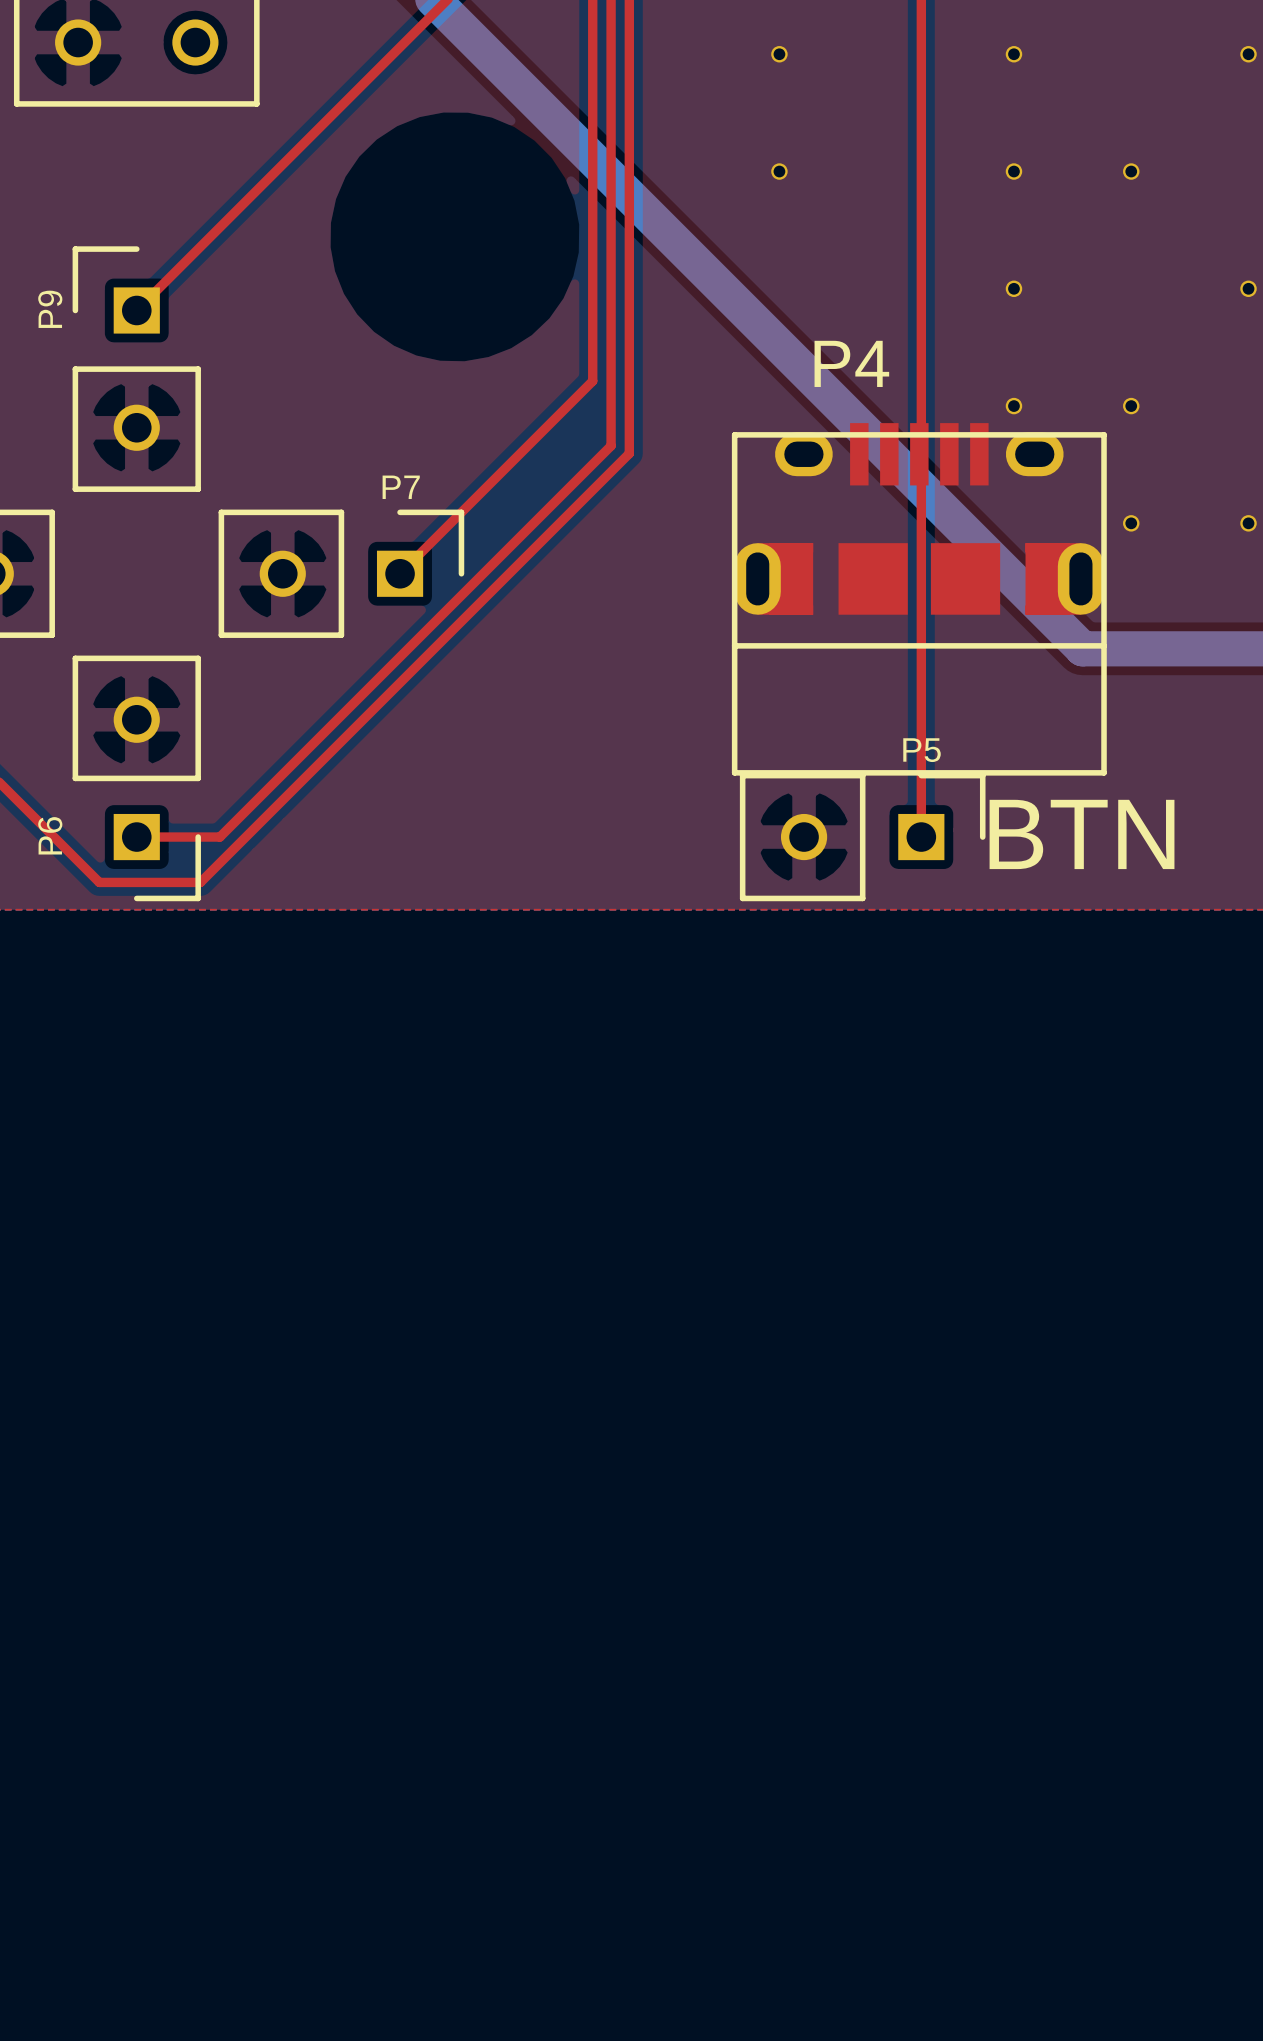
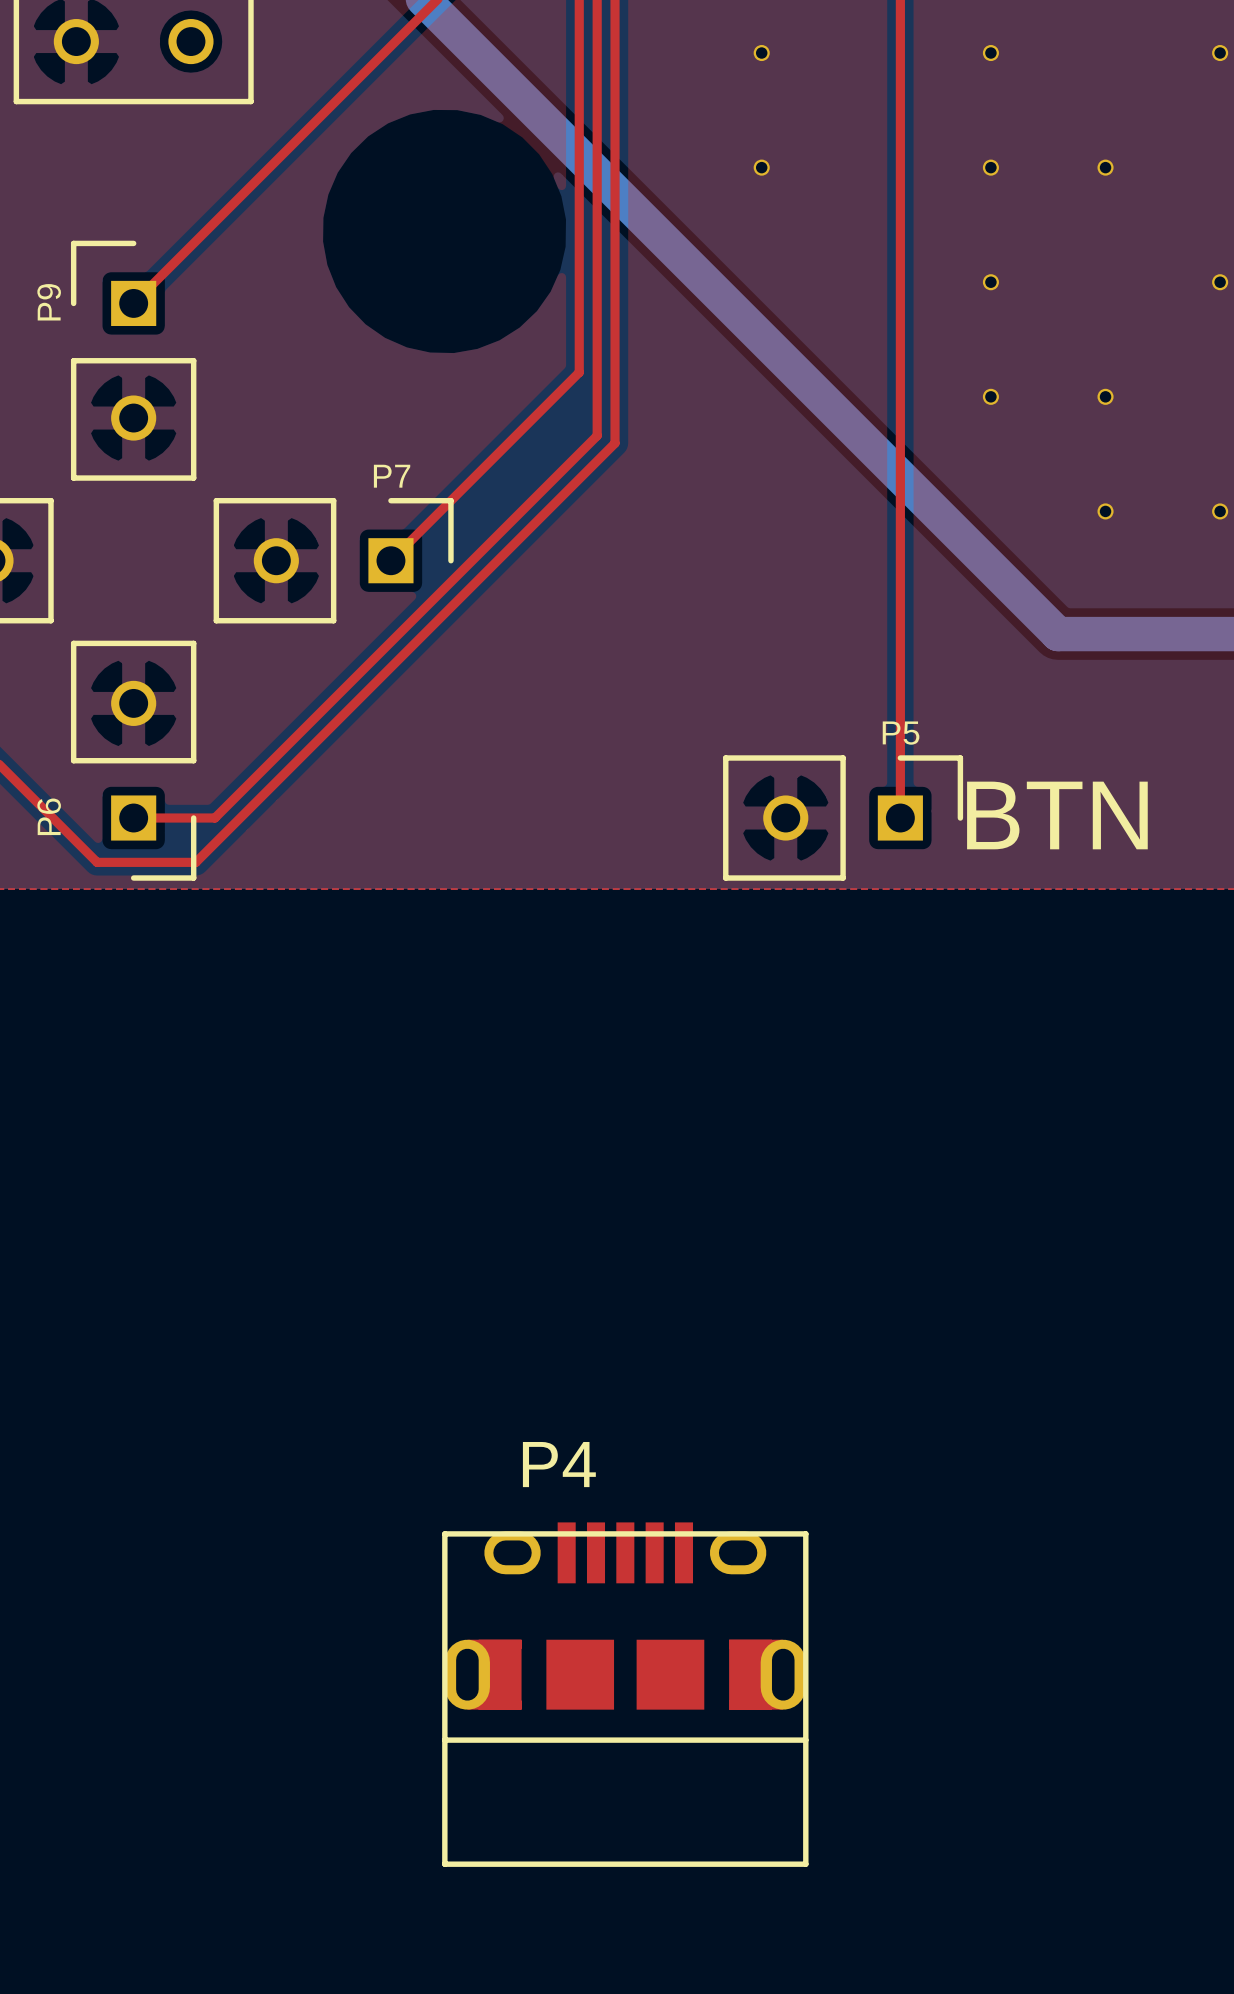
P4: (919, 599) -> none
P4: none -> (625, 1694)

